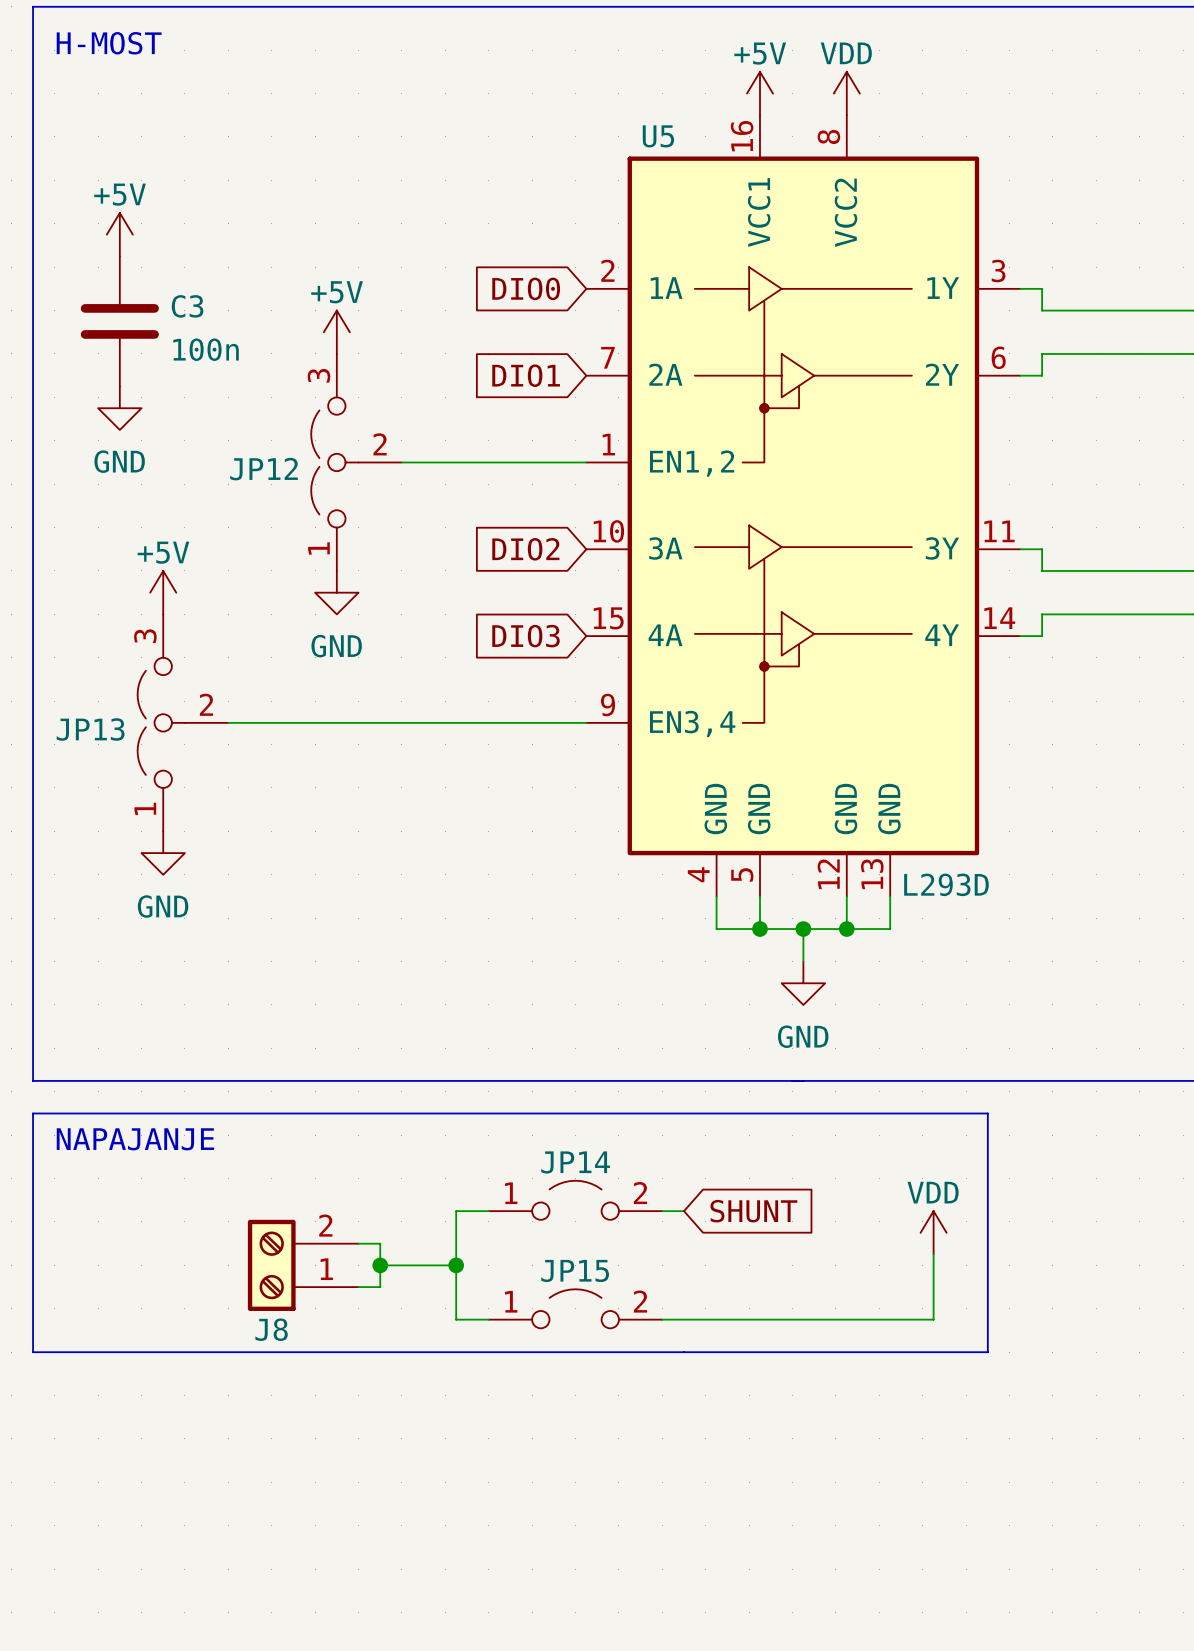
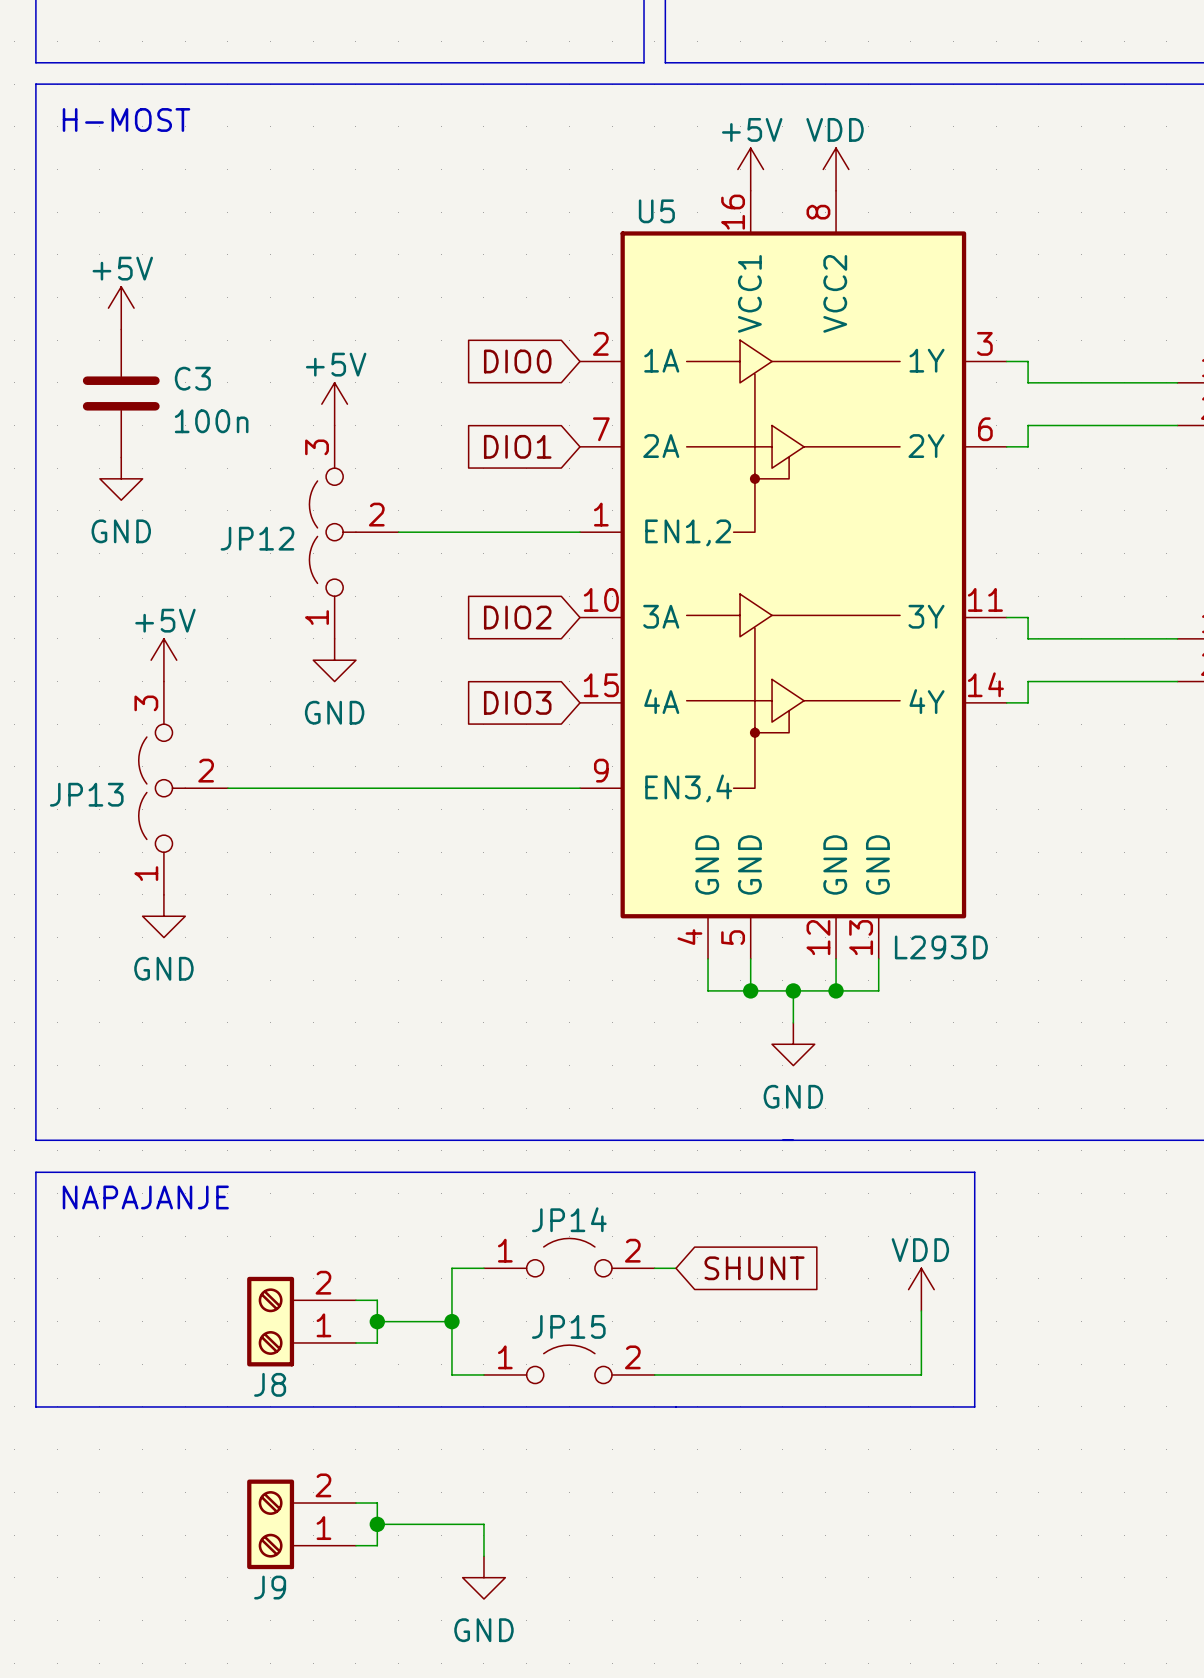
wire: none -> (355, 1503) (377, 1503) (377, 1545) (355, 1545)
J9: none -> (301, 1524)
wire: none -> (377, 1524) (483, 1524) (483, 1556)
junction: none -> (377, 1524)
power symbol: none -> GND (483, 1577)

